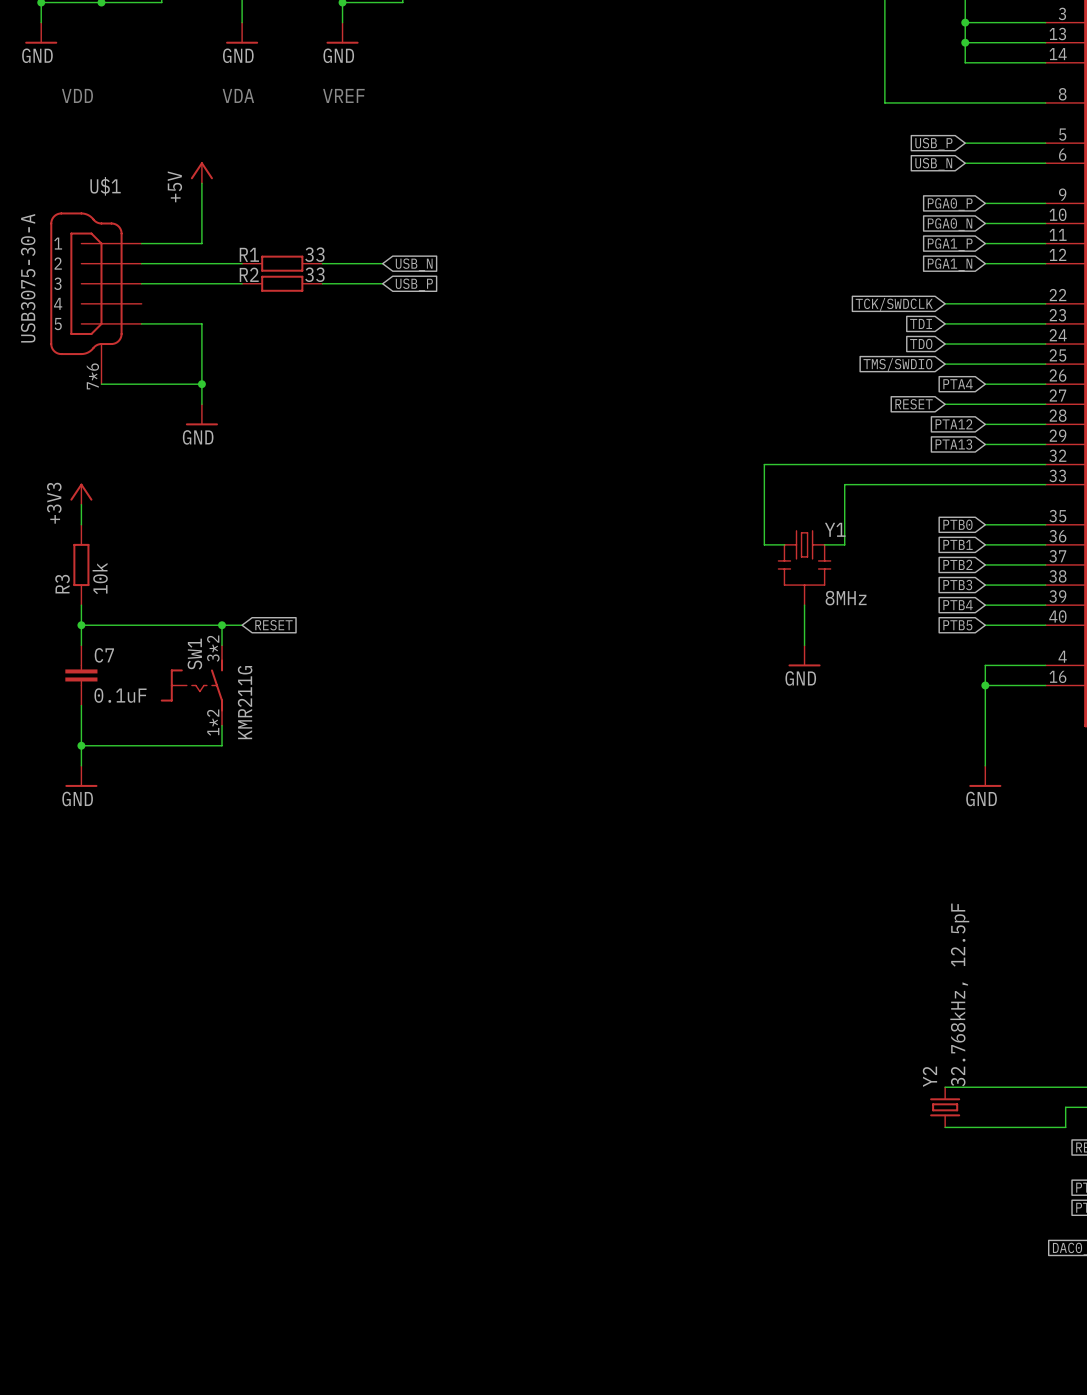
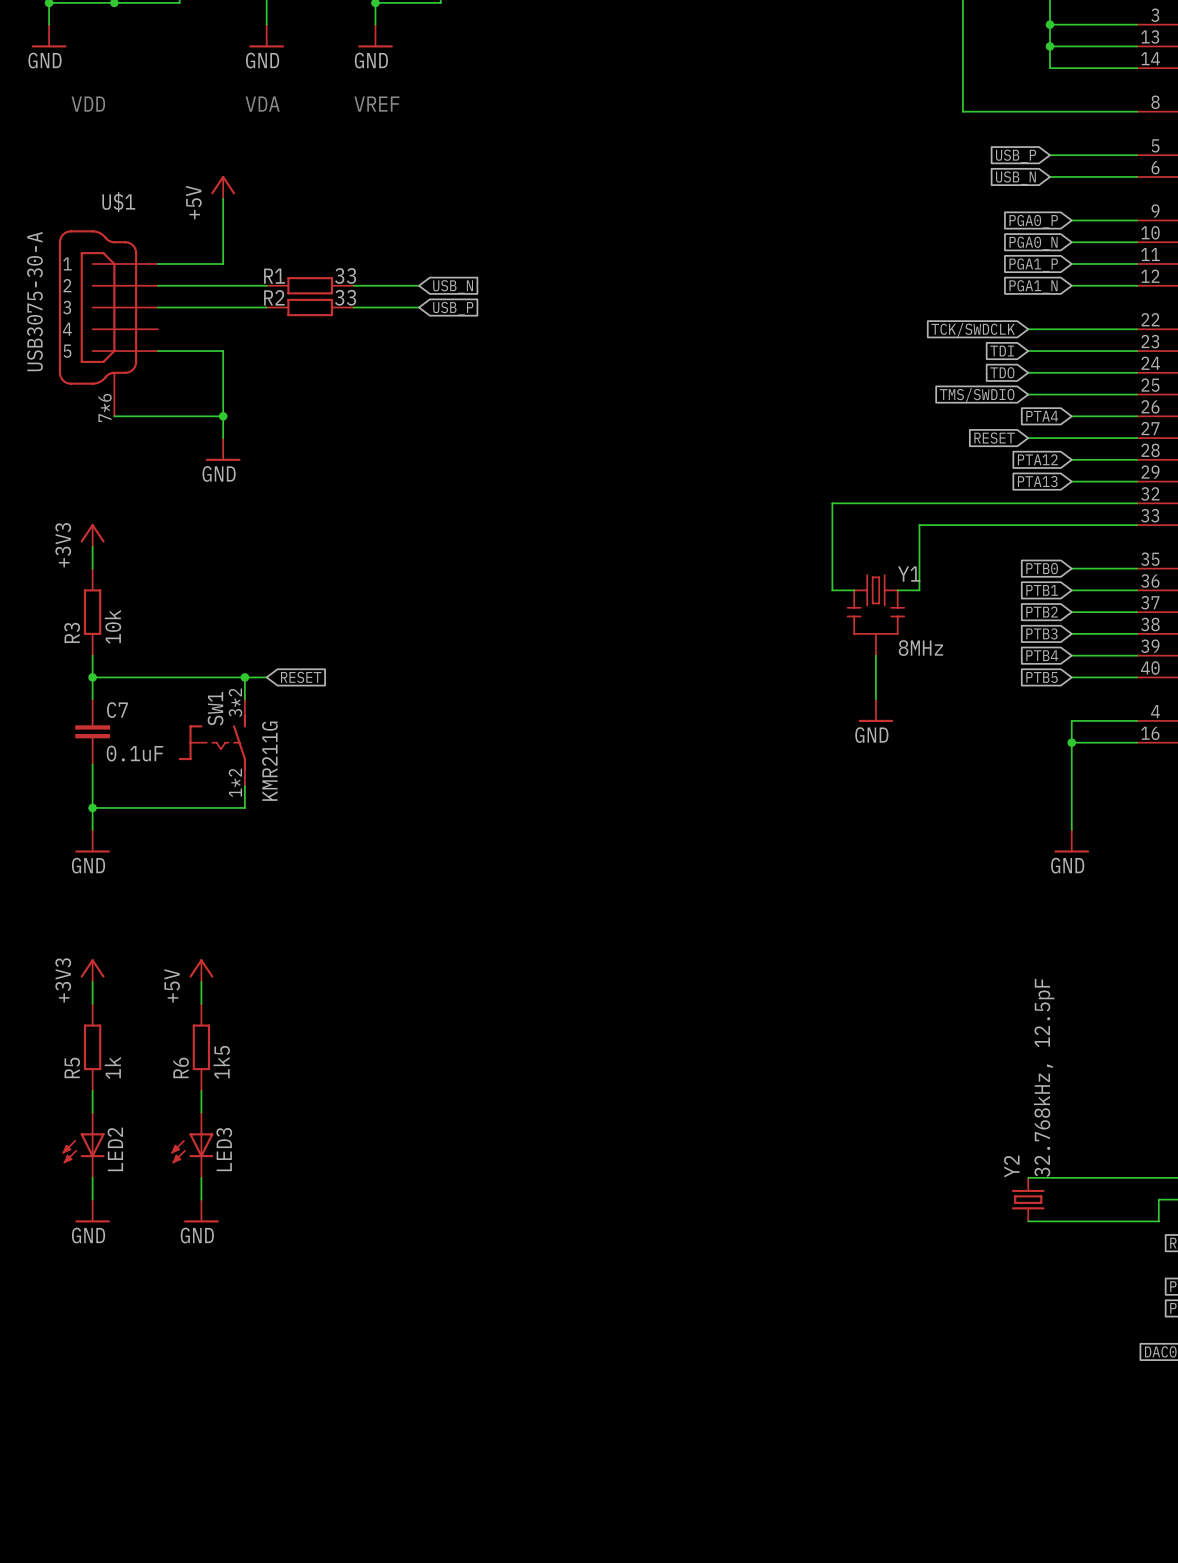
power symbol: none -> +3V3 (92, 970)
power symbol: none -> +5V (201, 970)
wire: none -> (92, 982) (92, 1003)
wire: none -> (201, 982) (201, 1003)
R5: none -> 1k (92, 1047)
R6: none -> 1k5 (201, 1047)
wire: none -> (92, 1090) (92, 1112)
wire: none -> (201, 1090) (201, 1112)
LED2: none -> (83, 1145)
LED3: none -> (192, 1145)
wire: none -> (92, 1177) (92, 1199)
wire: none -> (201, 1177) (201, 1199)
power symbol: none -> GND (92, 1211)
power symbol: none -> GND (201, 1211)

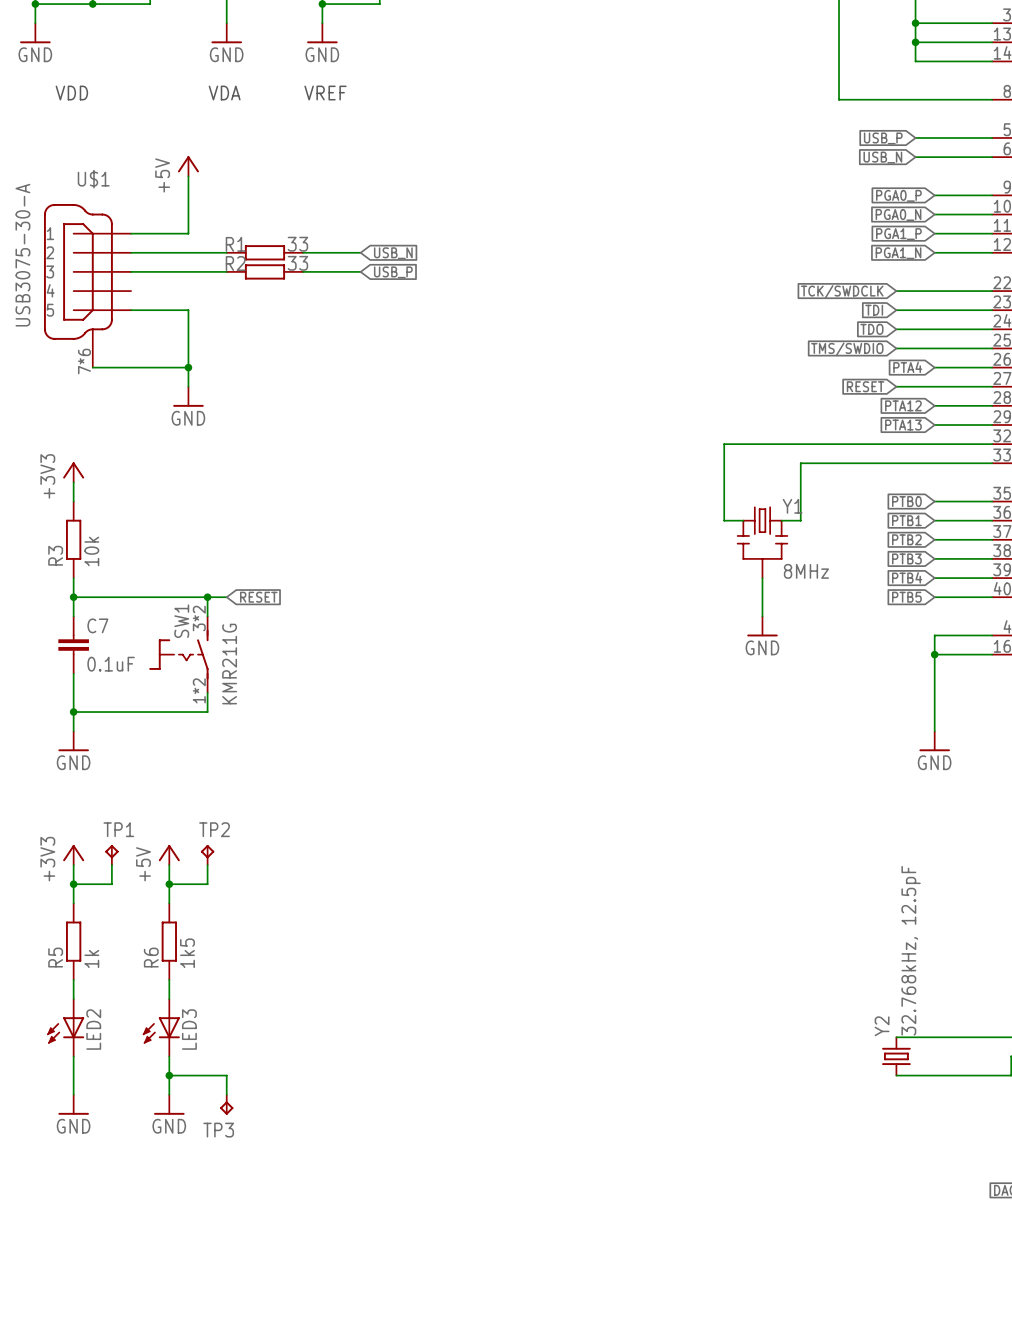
TP1: none -> (111, 855)
TP2: none -> (207, 855)
wire: none -> (111, 865) (111, 884) (73, 884) (73, 903)
wire: none -> (207, 865) (207, 884) (169, 884) (169, 903)
junction: none -> (73, 884)
junction: none -> (169, 884)
R5 position: (92, 1047) -> (73, 941)
R6 position: (201, 1047) -> (169, 941)
LED2 position: (83, 1145) -> (65, 1027)
LED3 position: (192, 1145) -> (161, 1027)
power symbol position: GND (92, 1211) -> GND (73, 1104)
power symbol position: GND (201, 1211) -> GND (169, 1104)
wire: none -> (169, 1075) (226, 1075) (226, 1094)
junction: none -> (169, 1075)
TP3: none -> (226, 1104)

